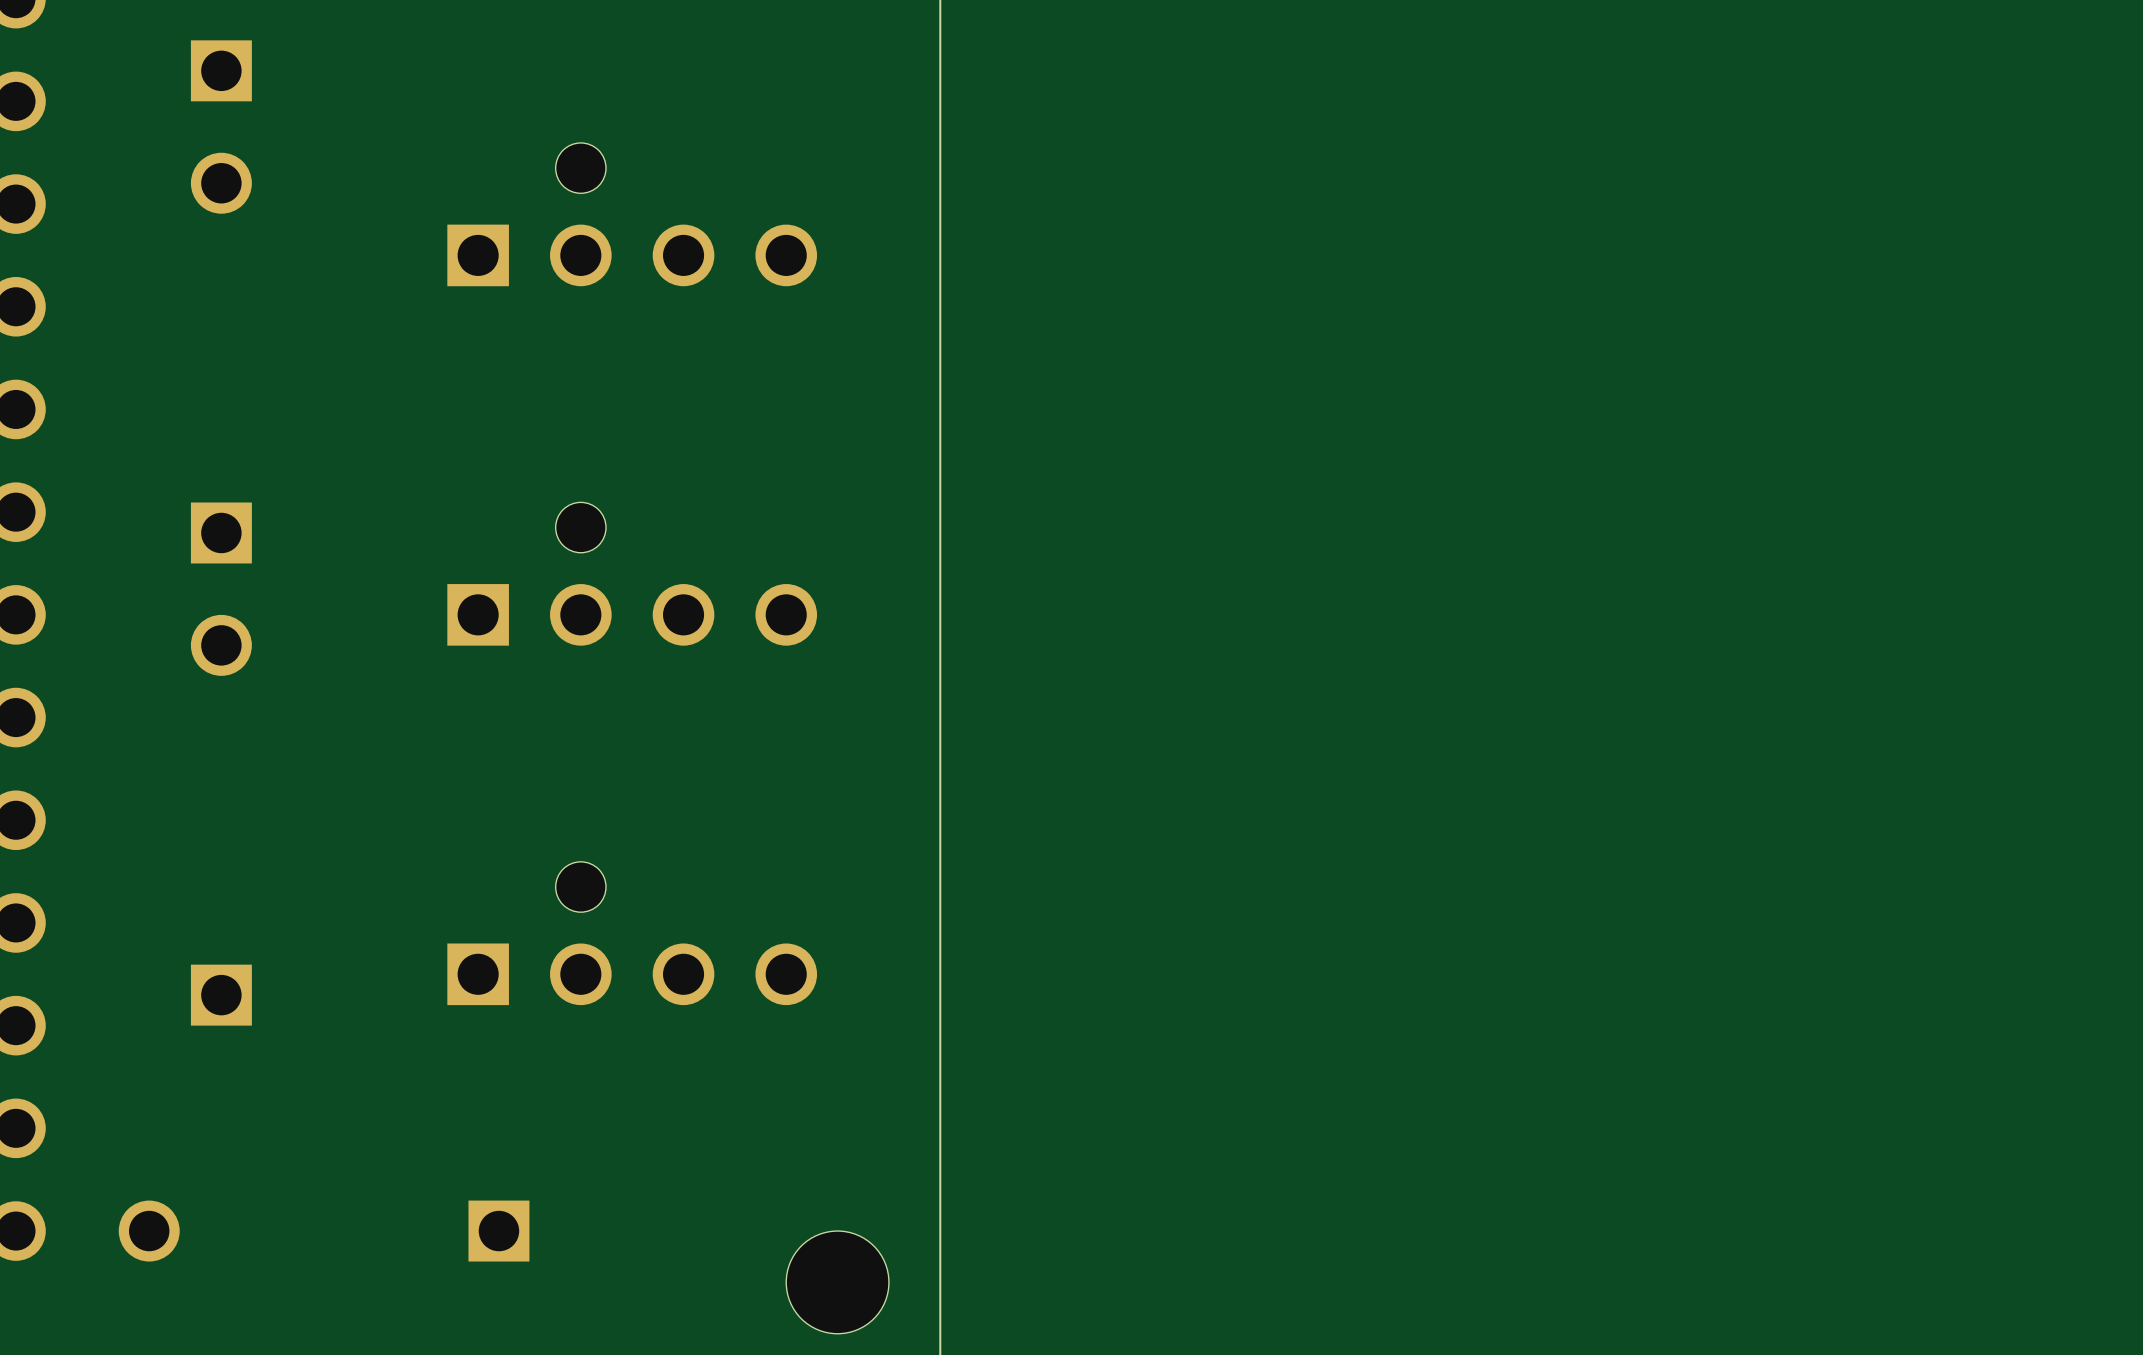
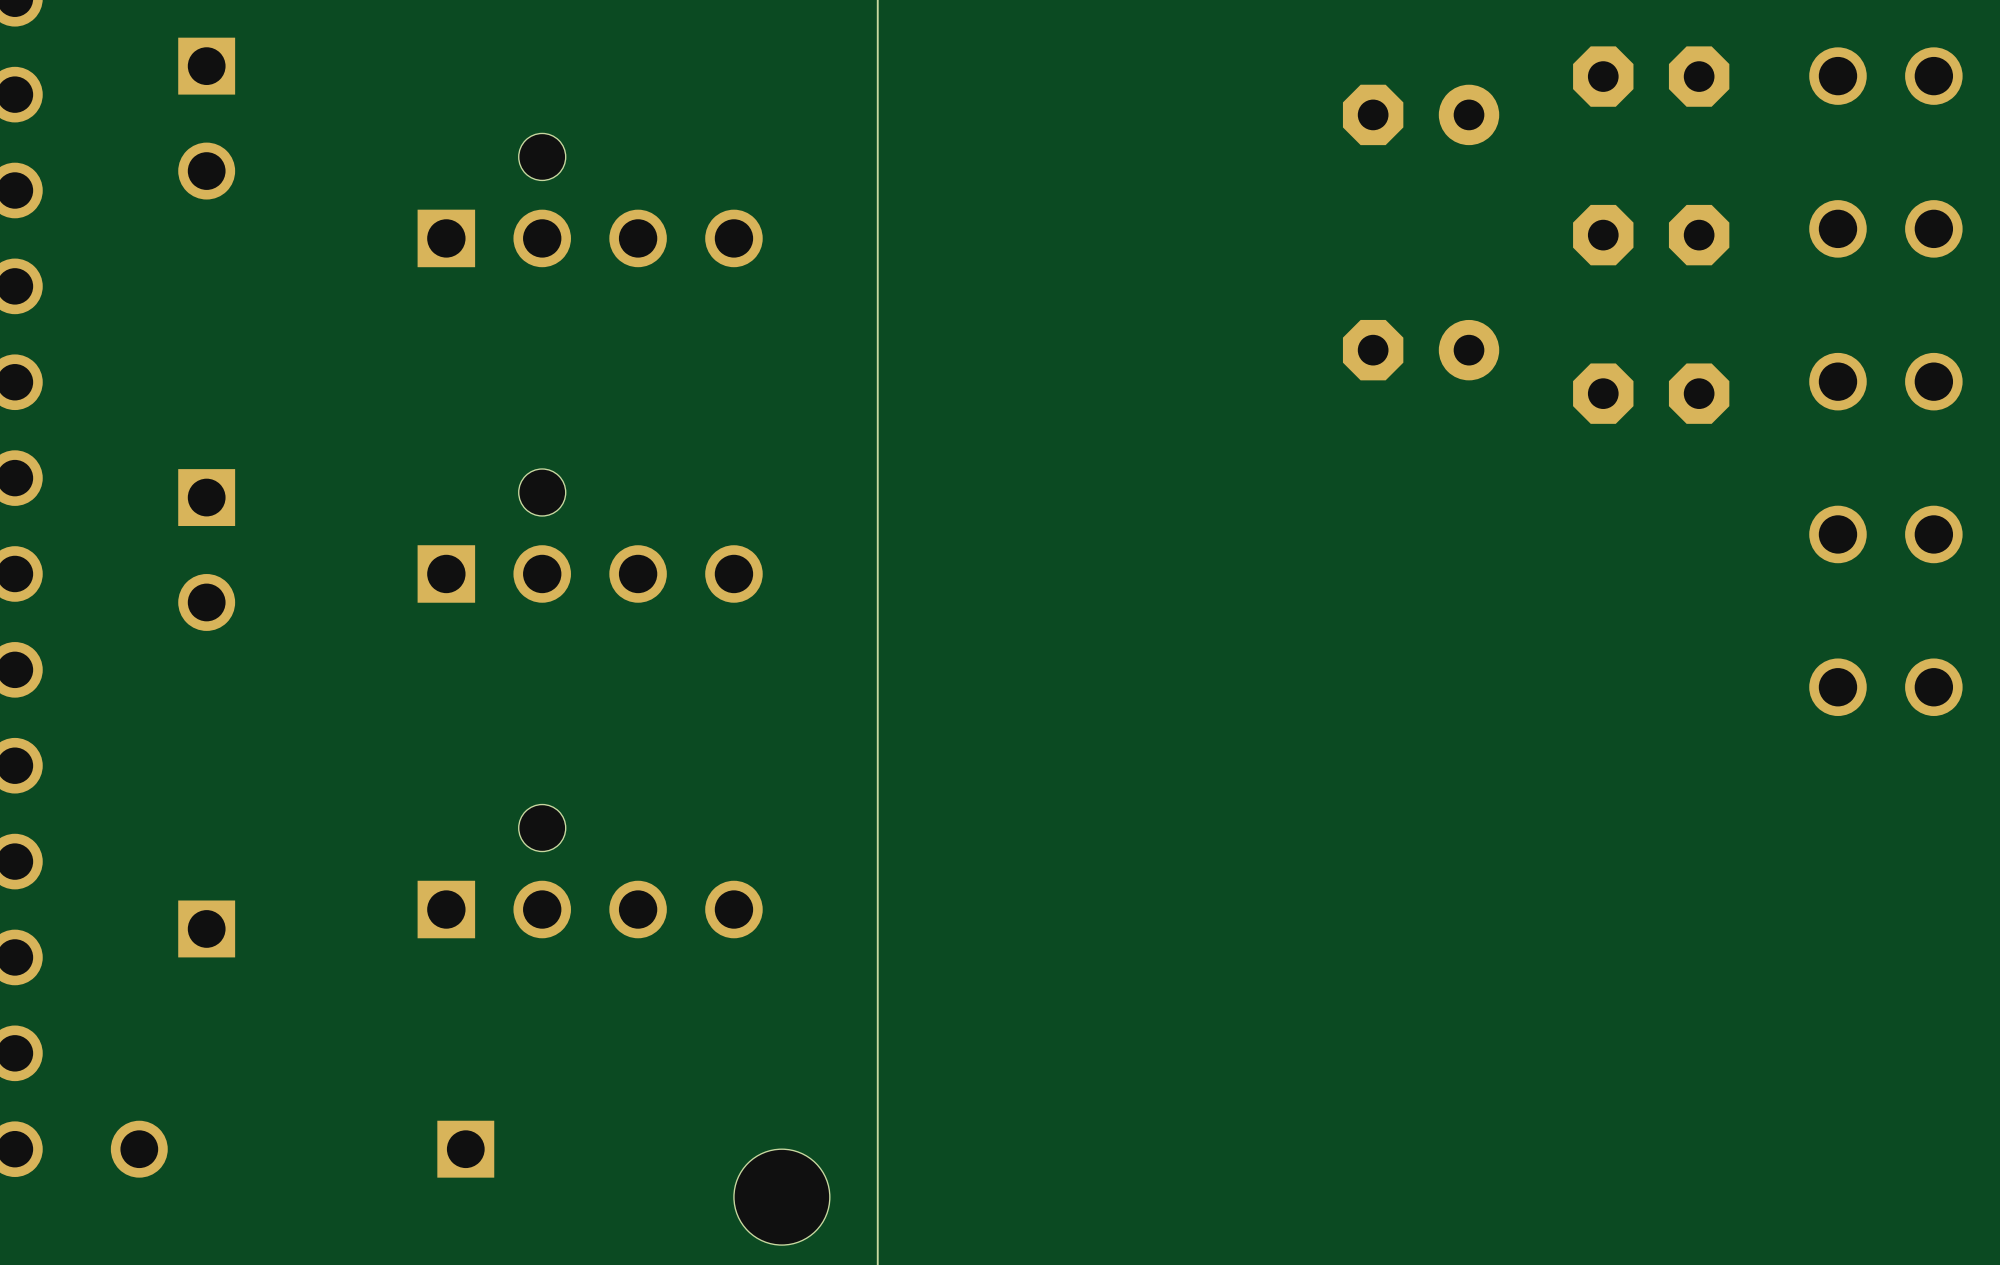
part: none -> (1885, 76)
part: none -> (1651, 76)
part: none -> (1421, 114)
part: none -> (1885, 228)
part: none -> (1651, 235)
part: none -> (1421, 350)
part: none -> (1885, 381)
part: none -> (1651, 393)
part: none -> (1885, 534)
part: none -> (1885, 687)

